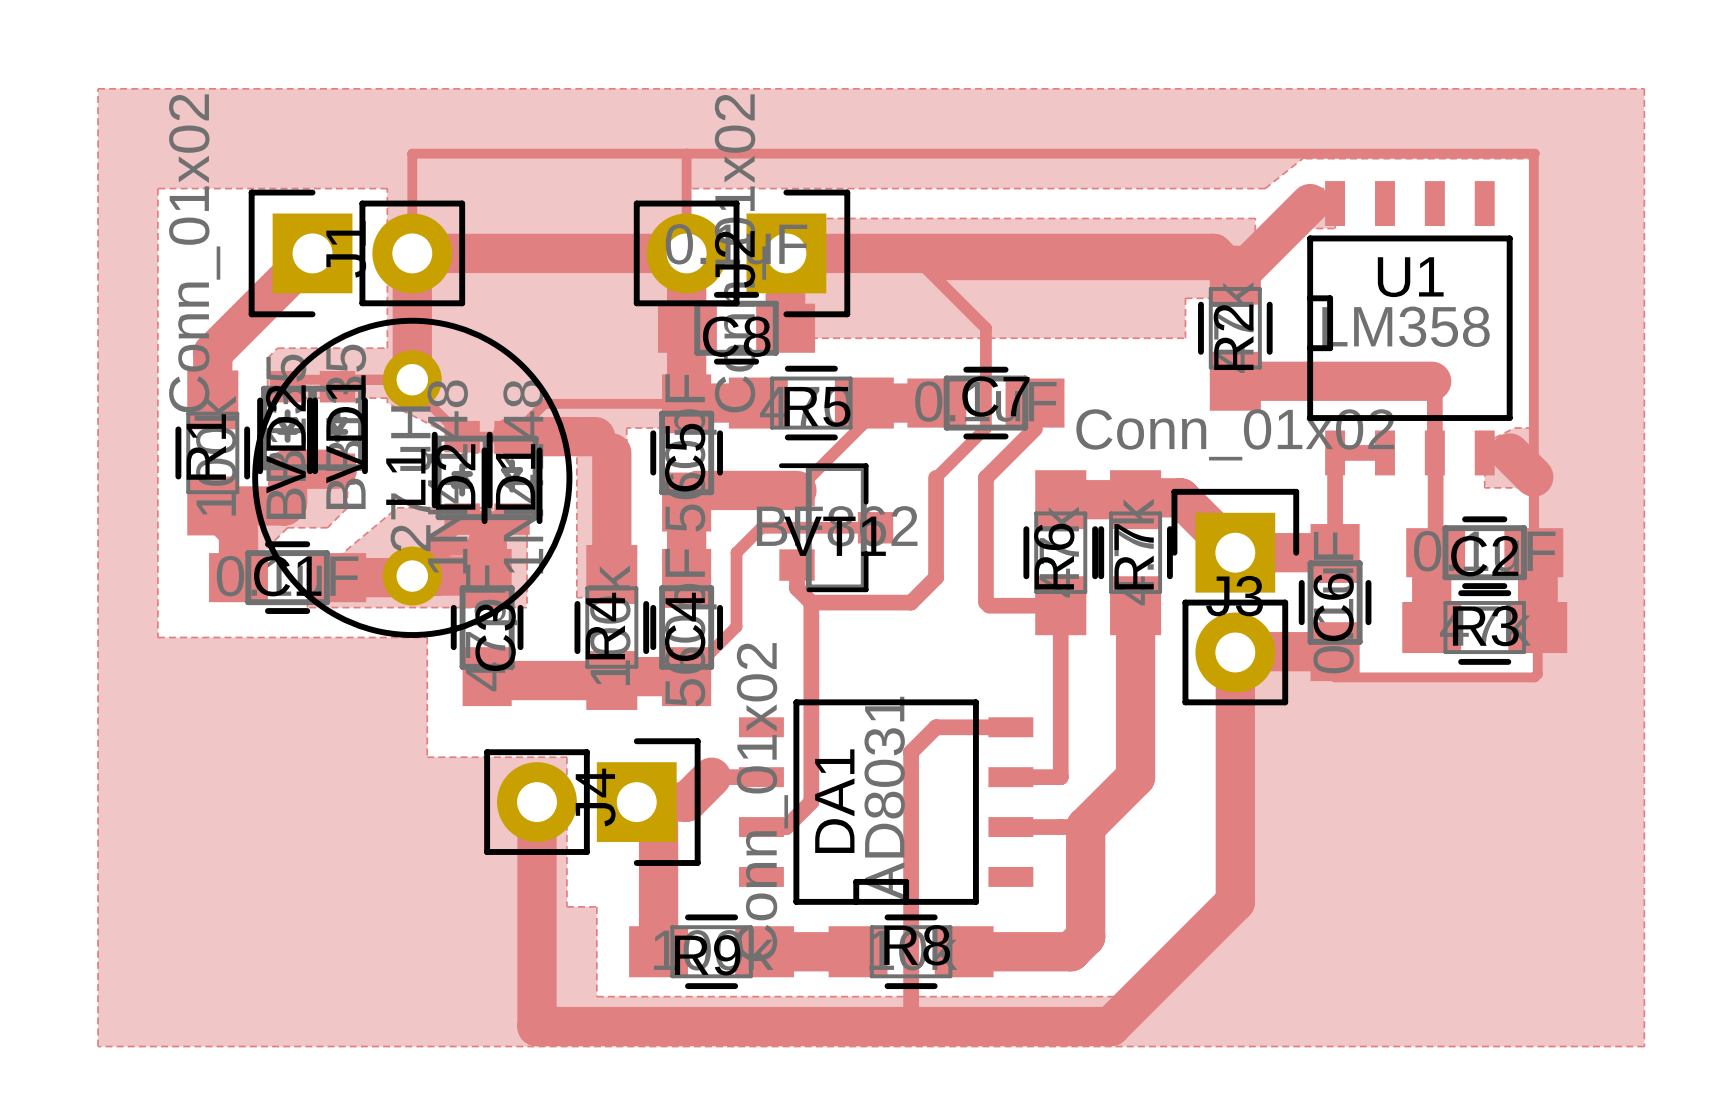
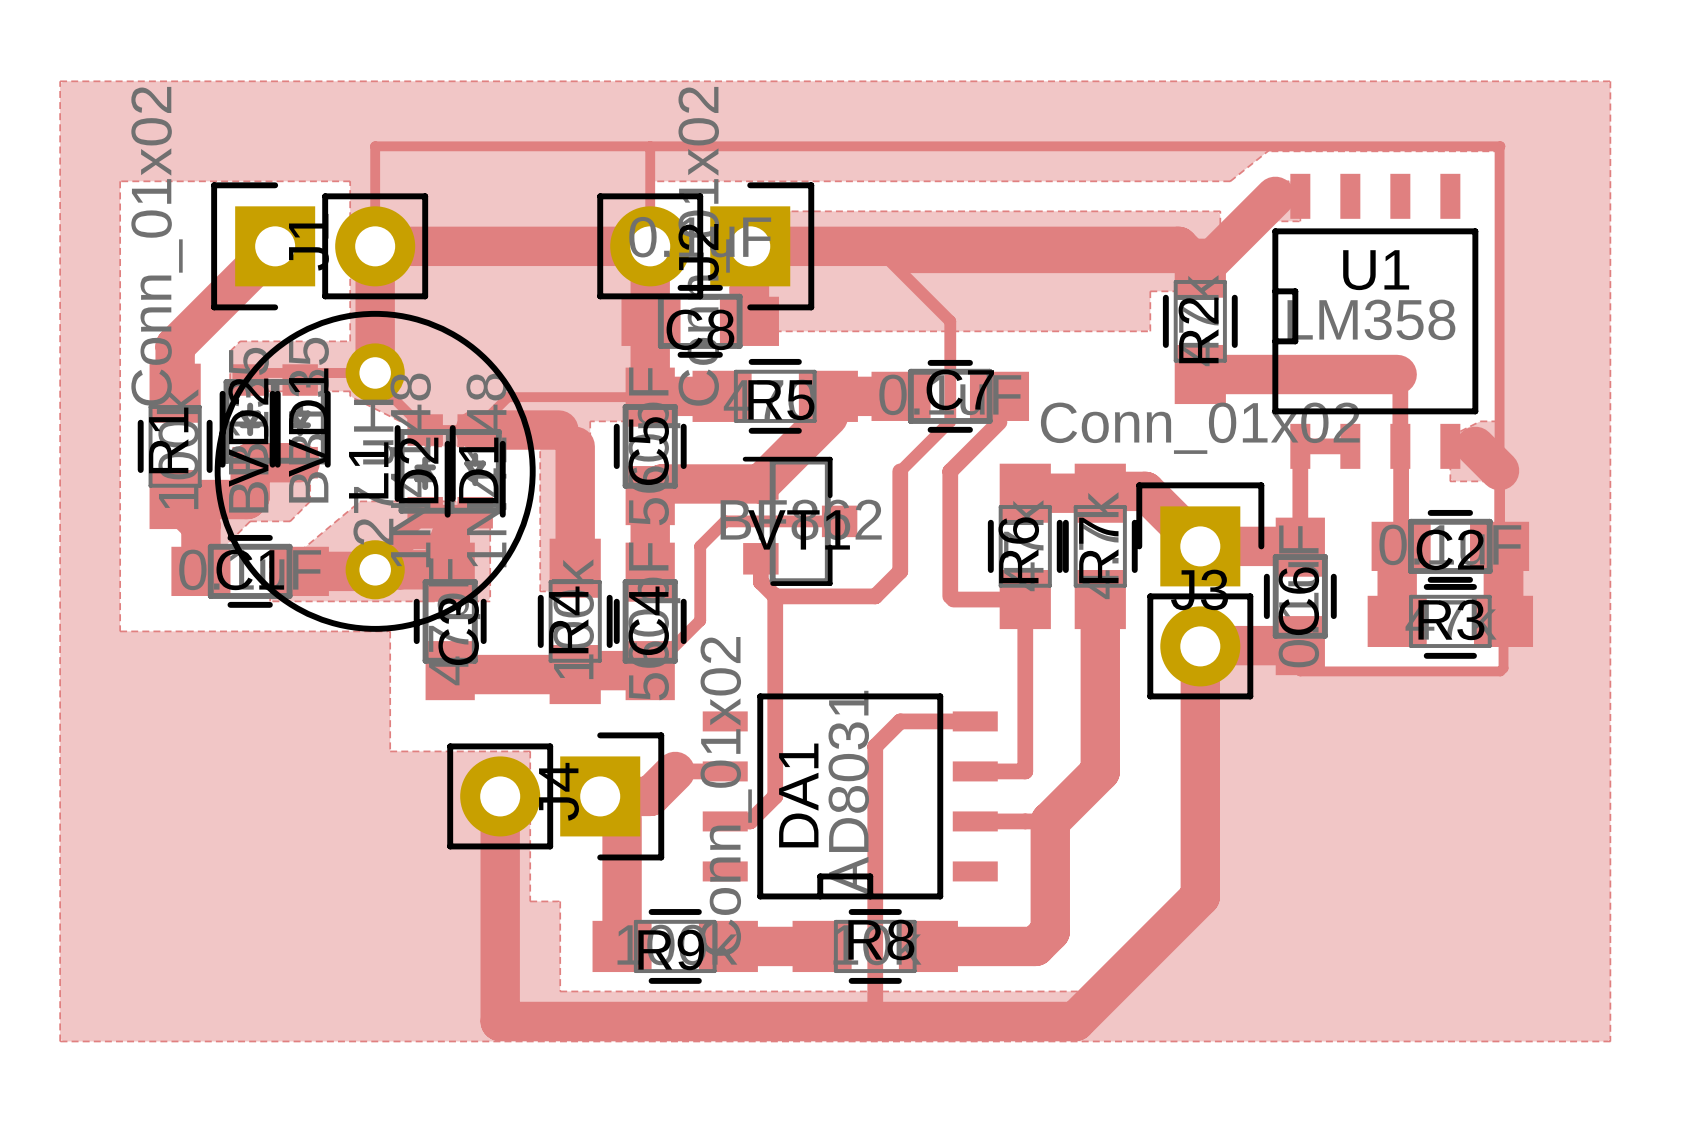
top track width: thin (864, 423) (797, 490) -> thick (828, 416) (760, 483)

